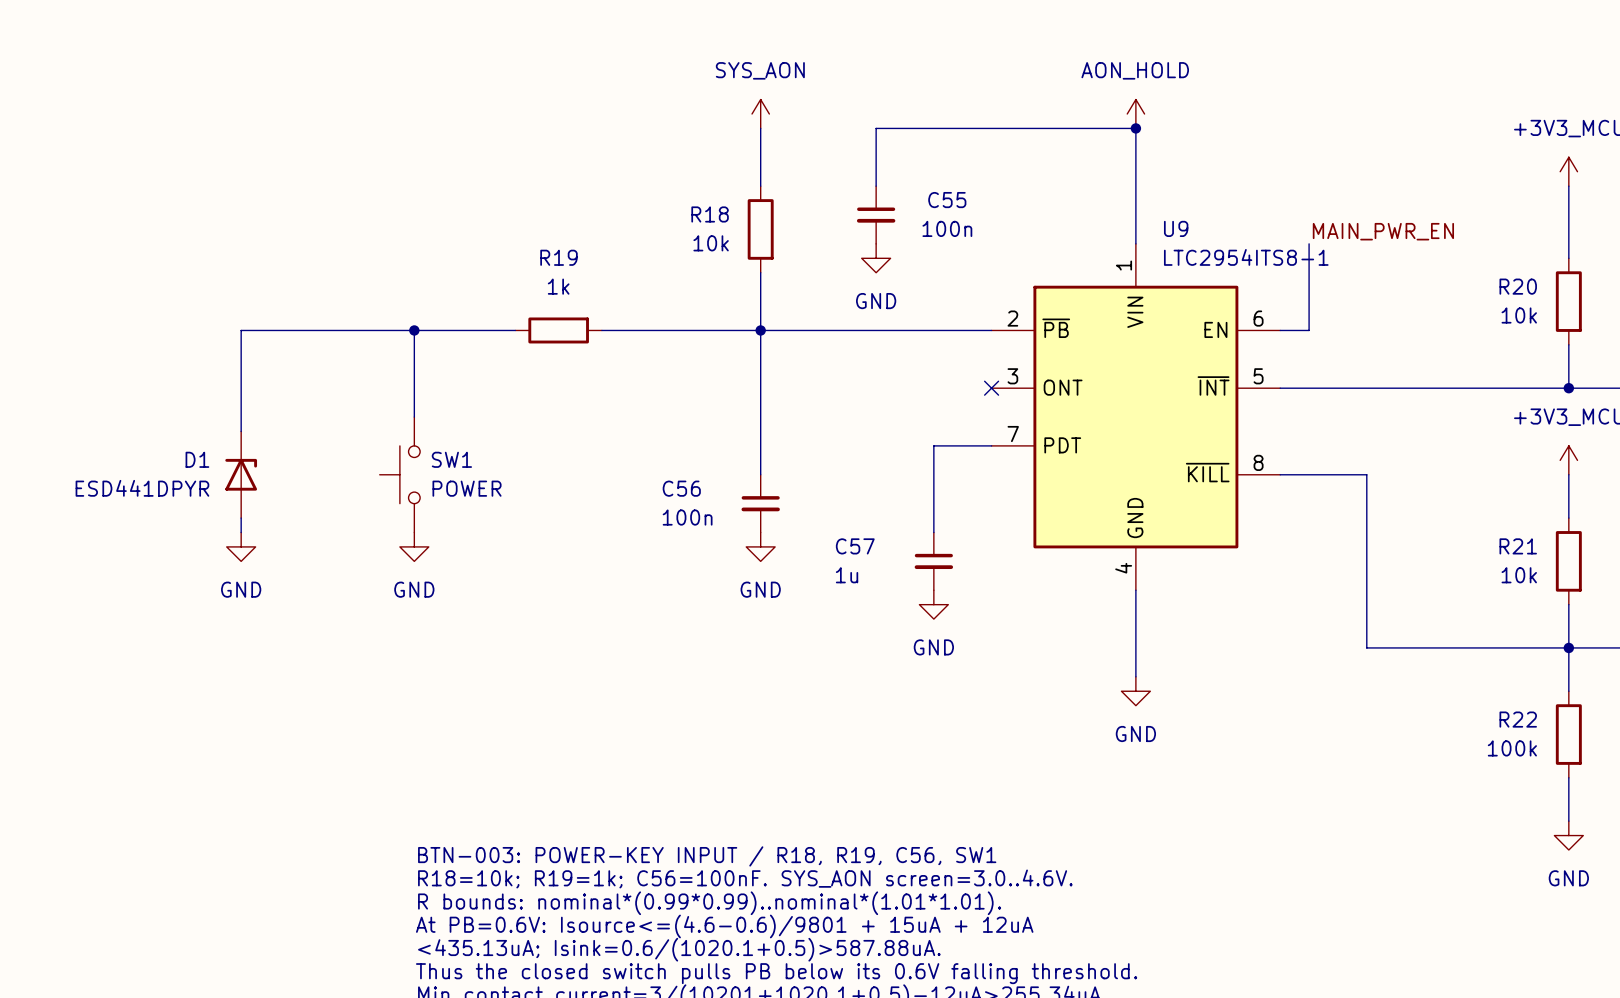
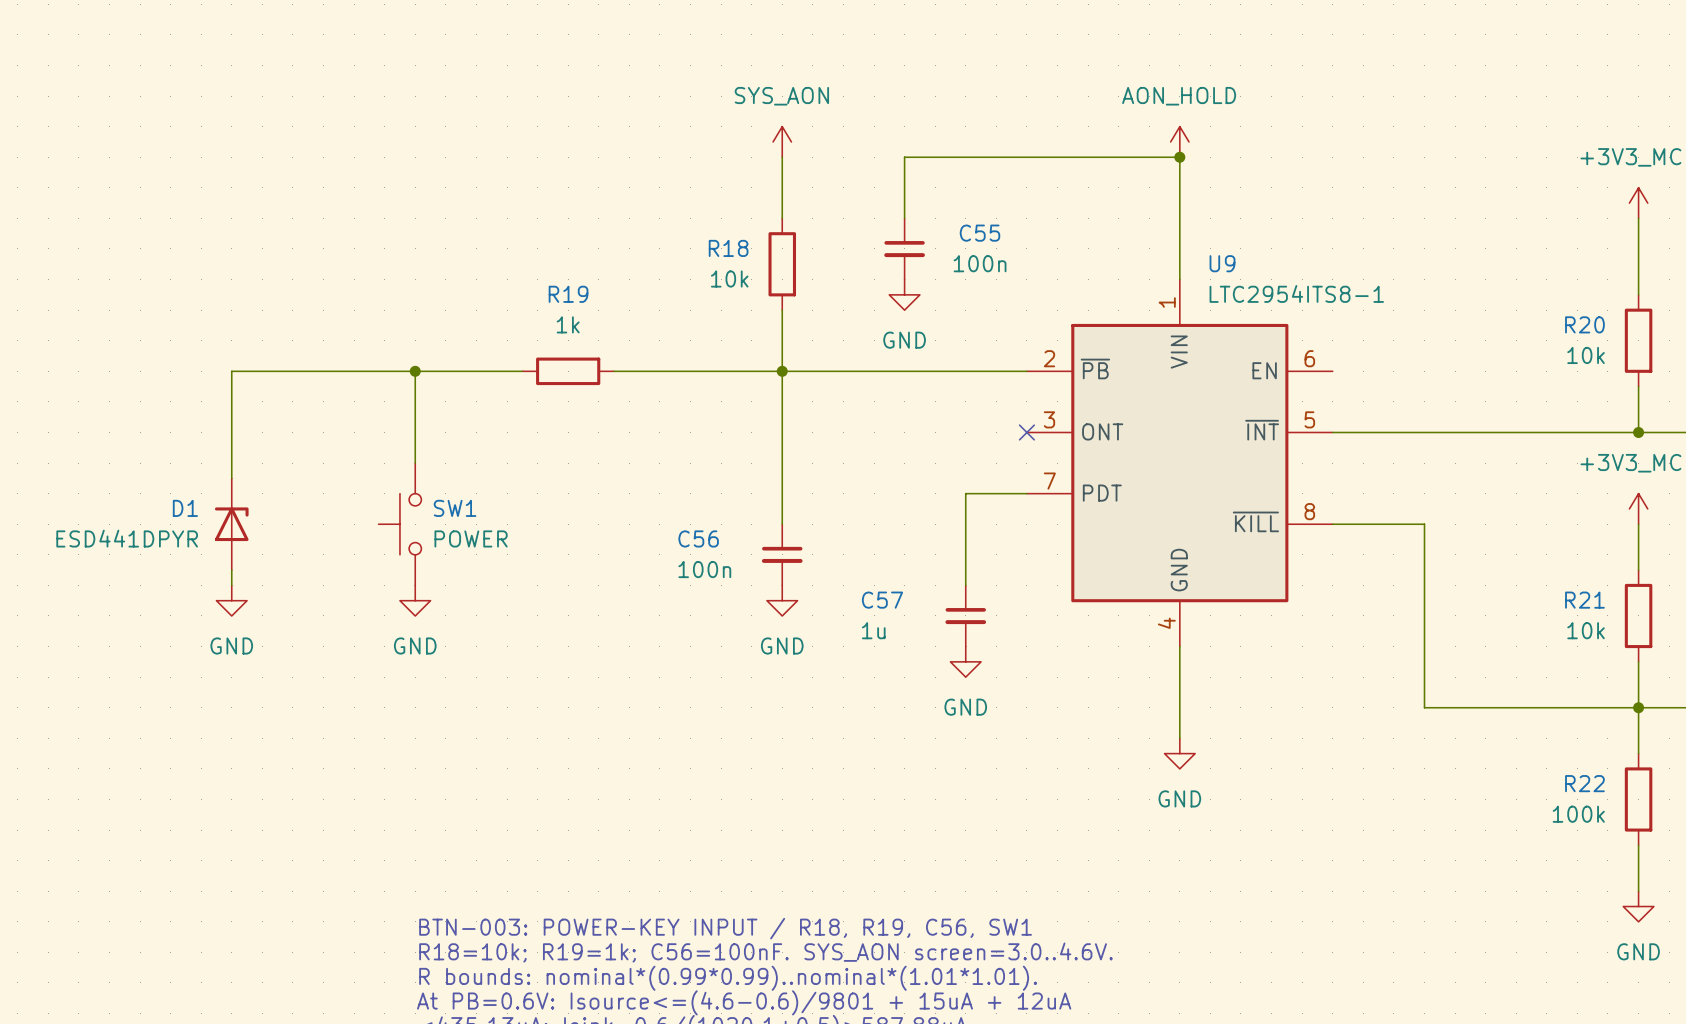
label: MAIN_PWR_EN (1383, 231) -> none
wire: (1309, 243) (1309, 330) (1280, 330) -> none

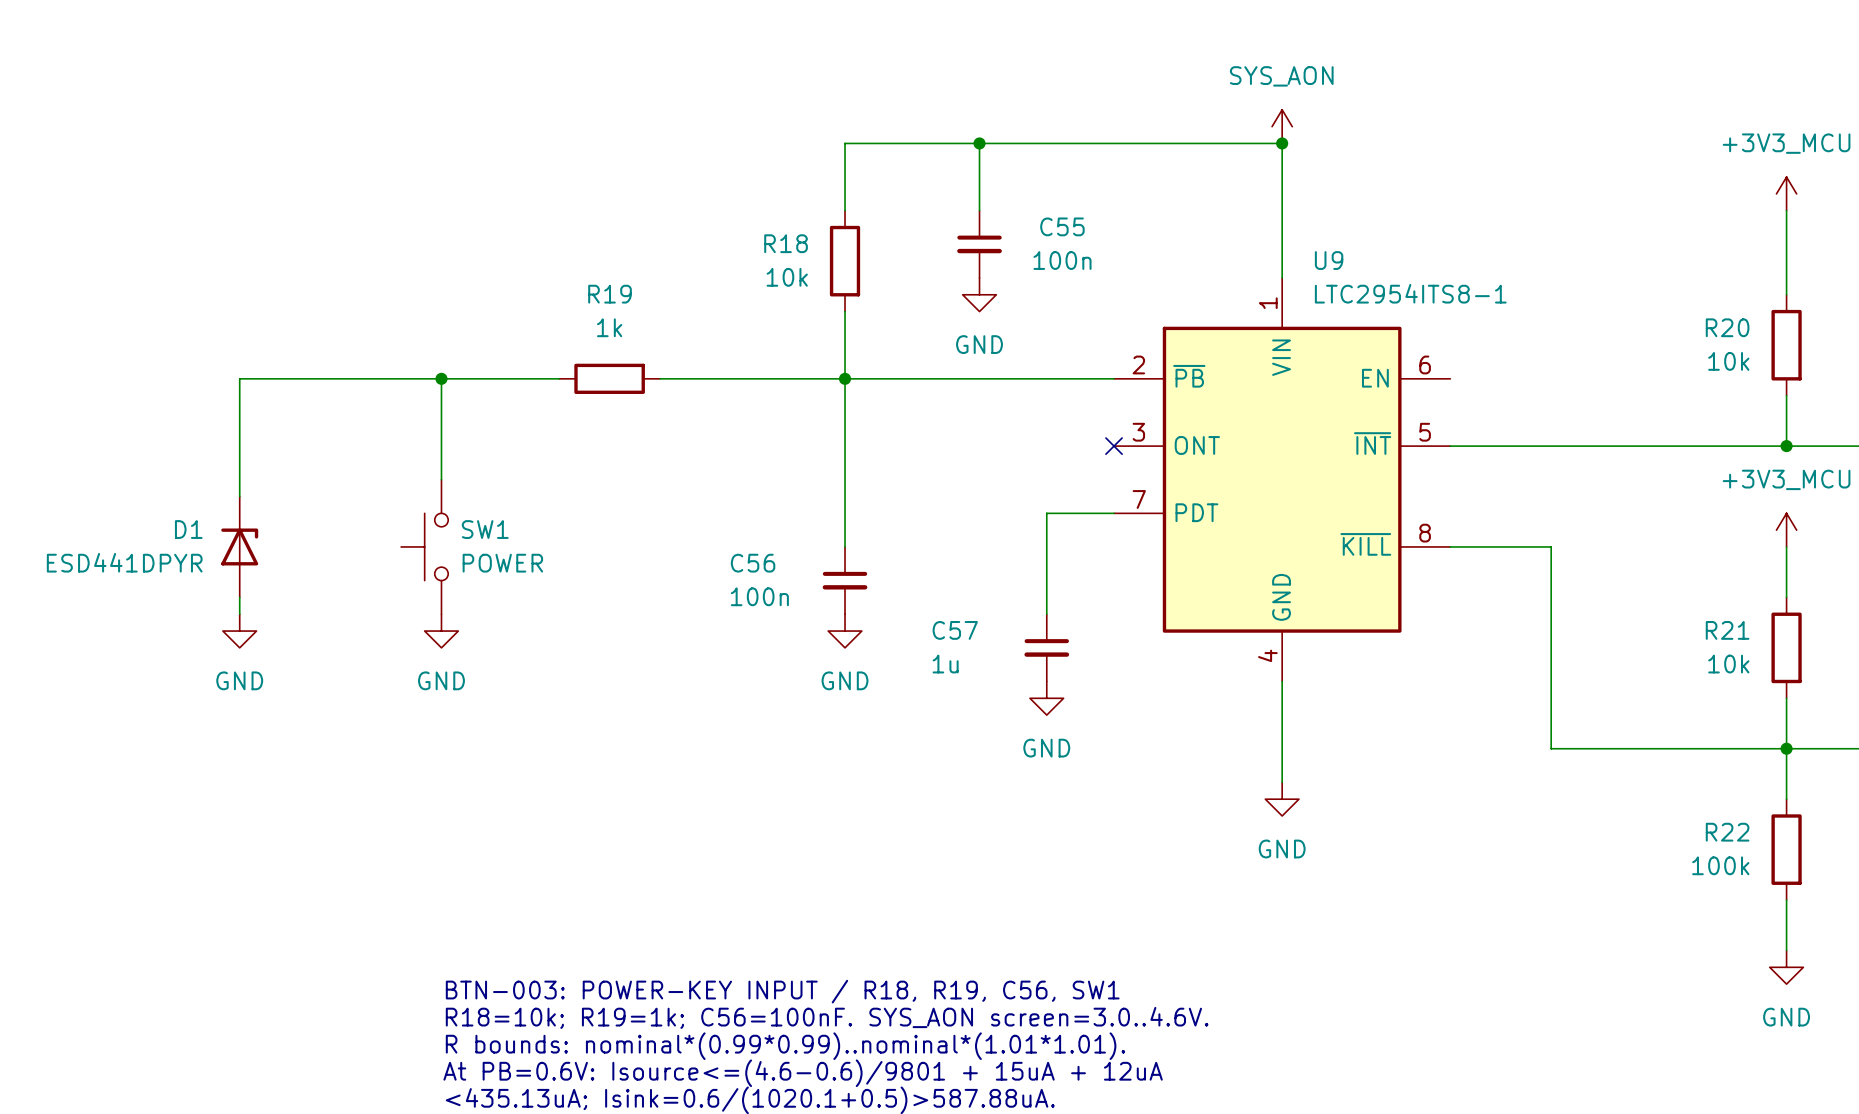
power symbol: SYS_AON (782, 141) -> none
power symbol: AON_HOLD (1179, 141) -> SYS_AON (1282, 126)
wire: none -> (845, 143) (979, 143)
junction: none -> (979, 143)

